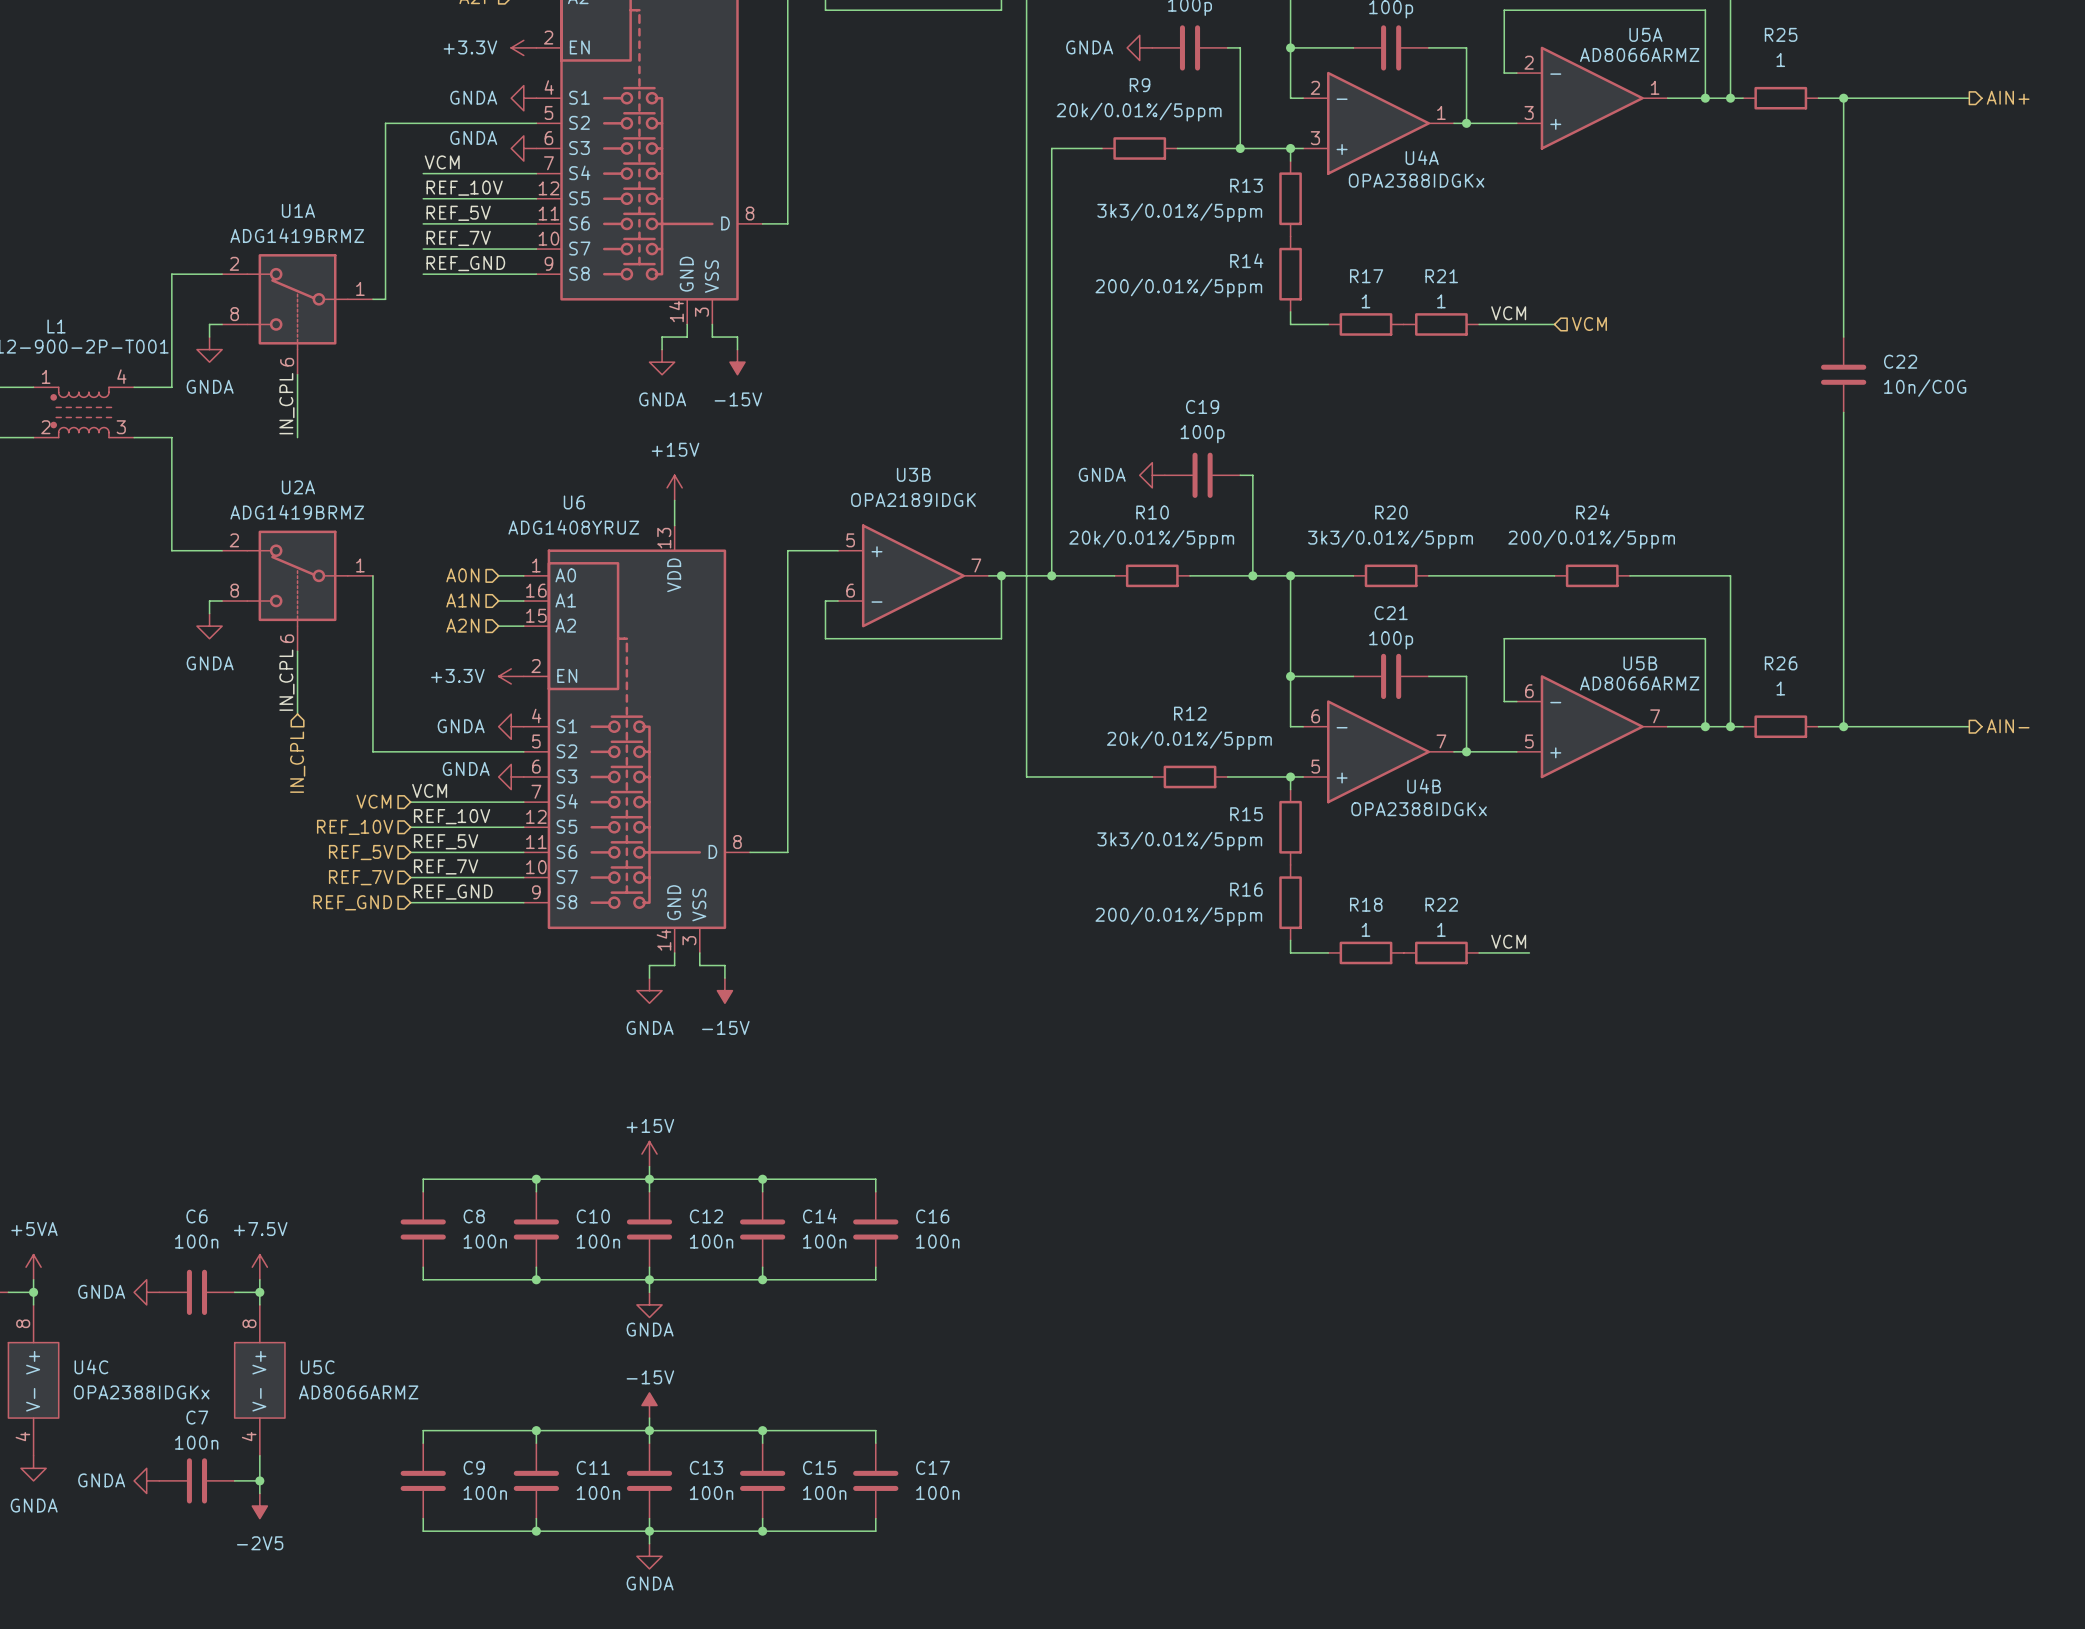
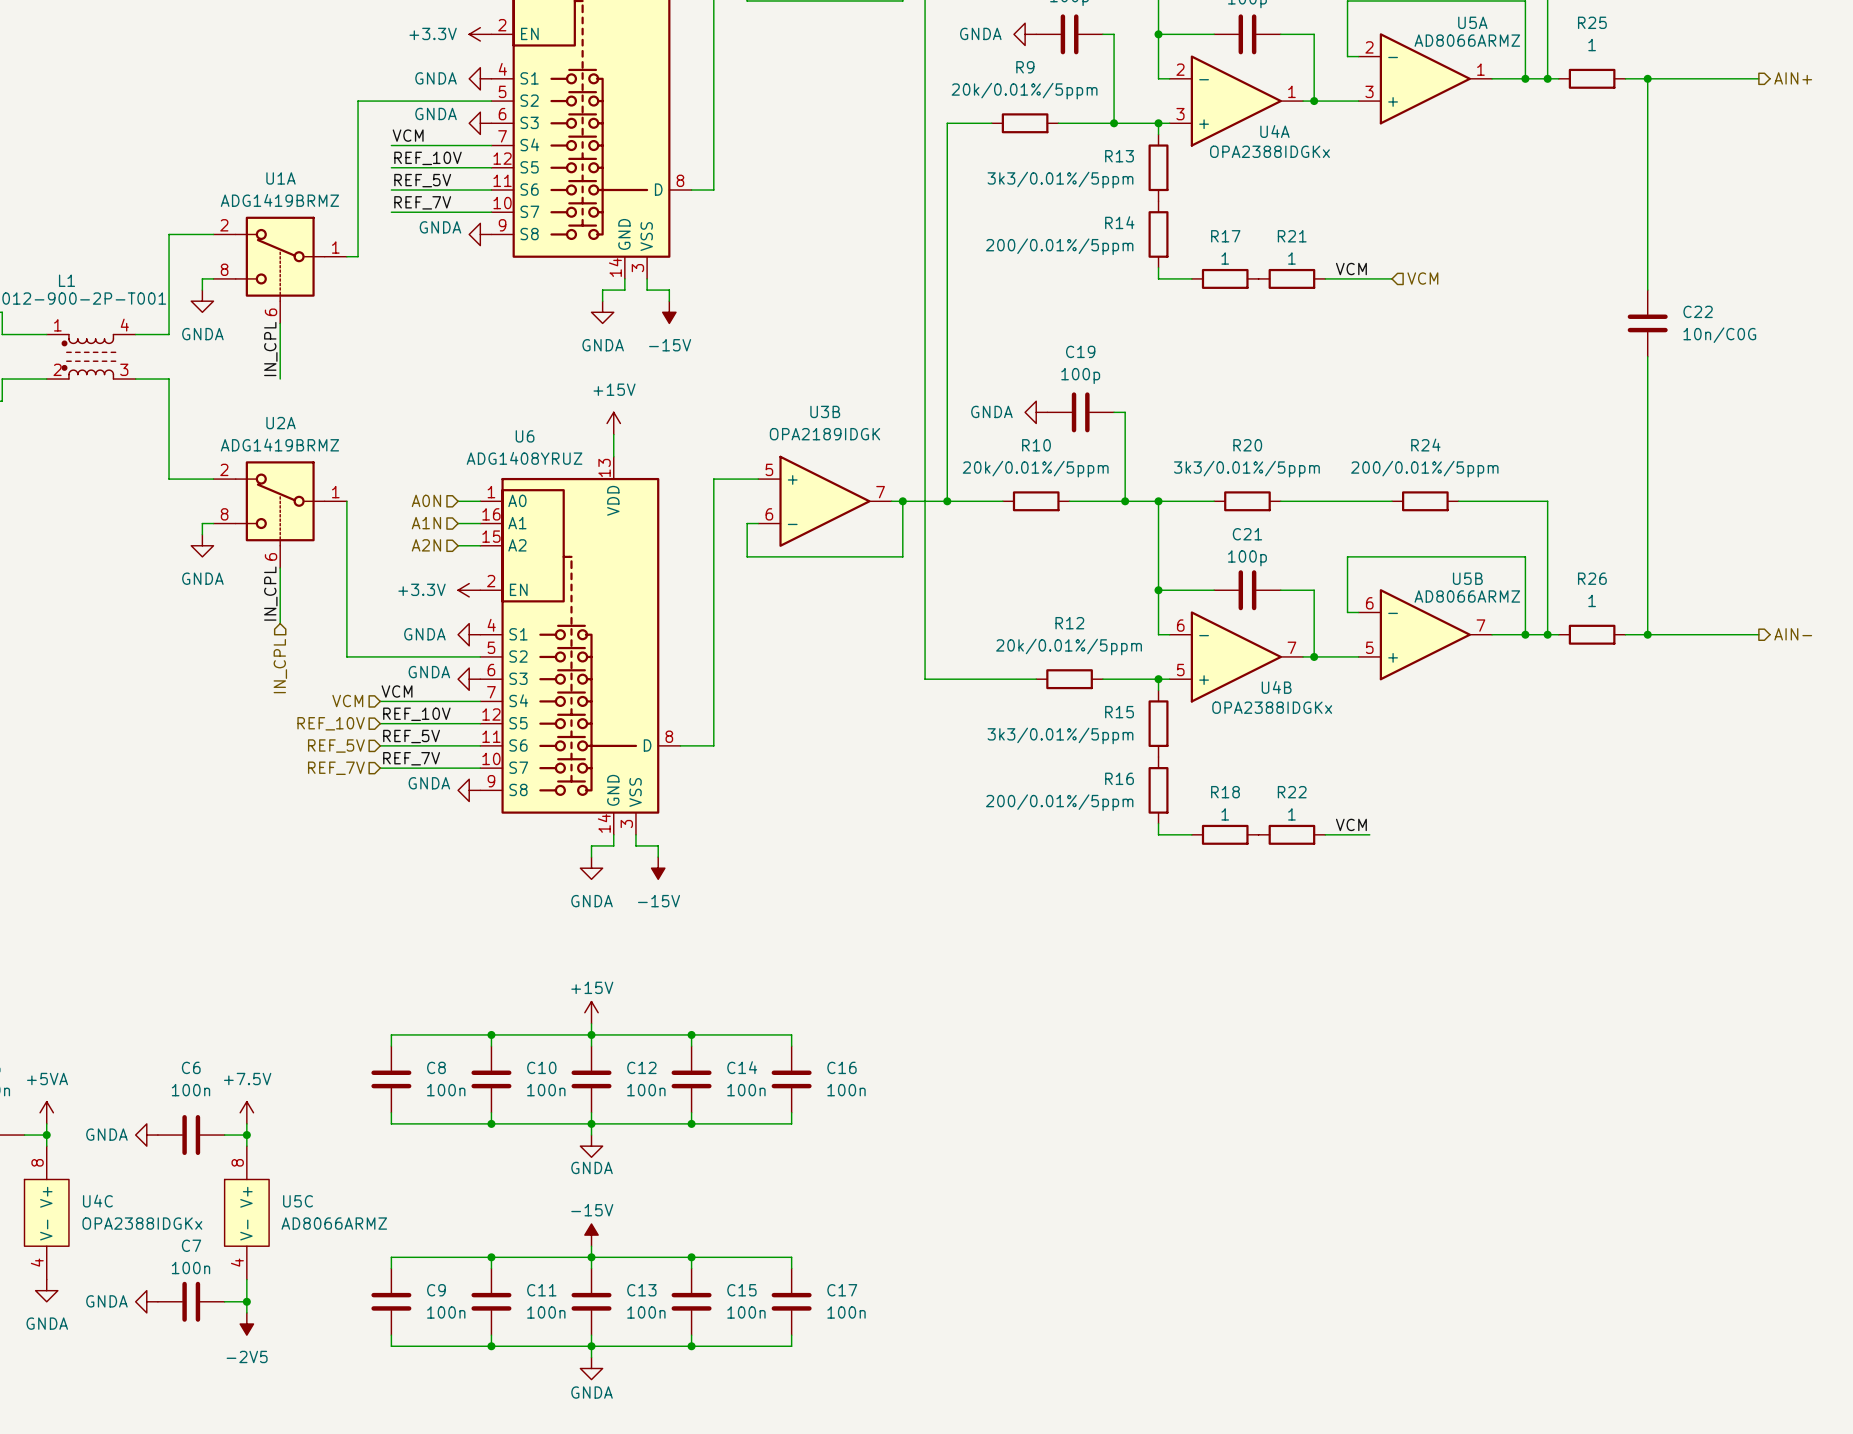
label: REF_GND (465, 263) -> none
wire: (423, 274) (536, 274) -> none
power symbol: none -> GNDA (480, 234)
label: REF_GND (453, 892) -> none
hierarchical label: REF_GND (352, 902) -> none
wire: (410, 902) (523, 902) -> none
power symbol: none -> GNDA (469, 790)

